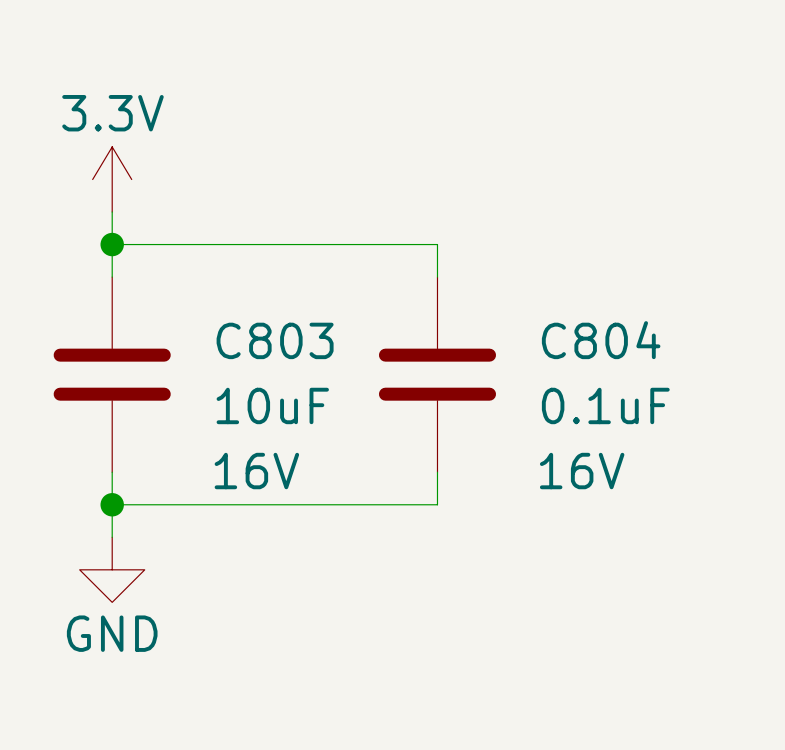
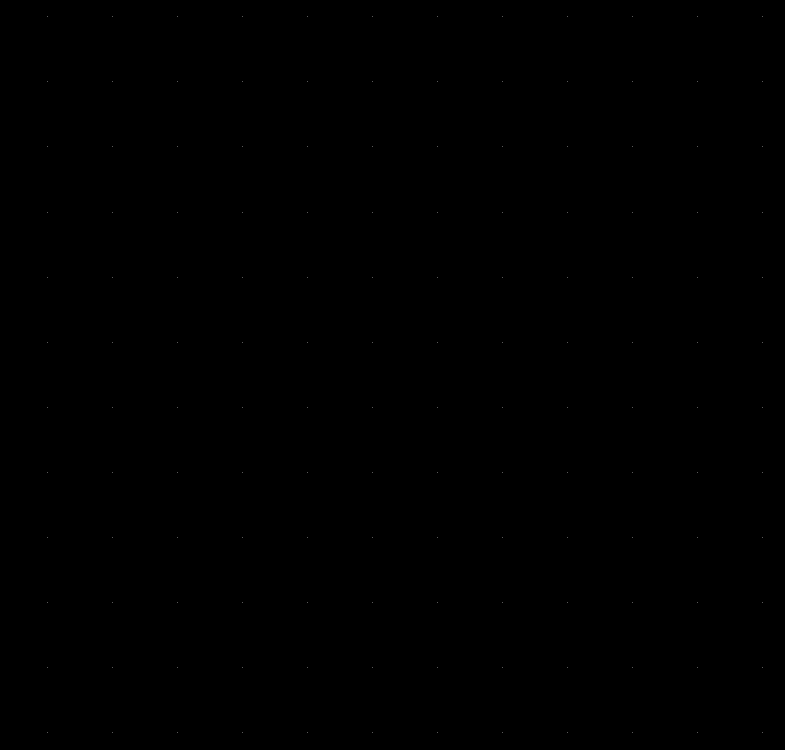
power symbol: 3.3V (112, 179) -> none
wire: (112, 212) (112, 277) -> none
wire: (112, 244) (437, 244) (437, 277) -> none
junction: (112, 244) -> none
C803: 10uF (112, 374) -> none
C804: 0.1uF (437, 374) -> none
wire: (112, 472) (112, 537) -> none
wire: (437, 472) (437, 504) (112, 504) -> none
junction: (112, 504) -> none
power symbol: GND (112, 569) -> none

